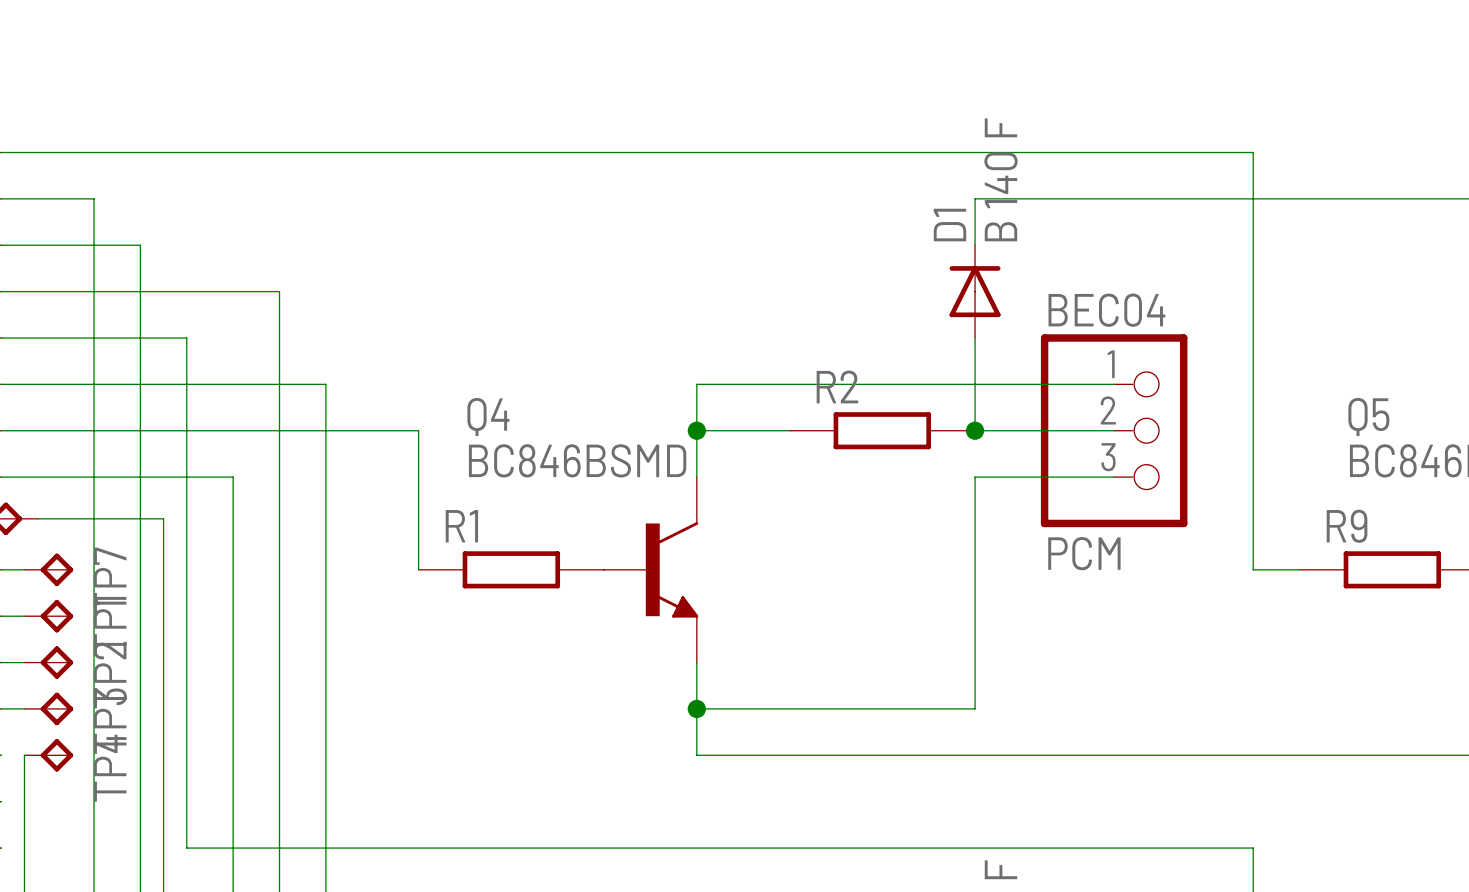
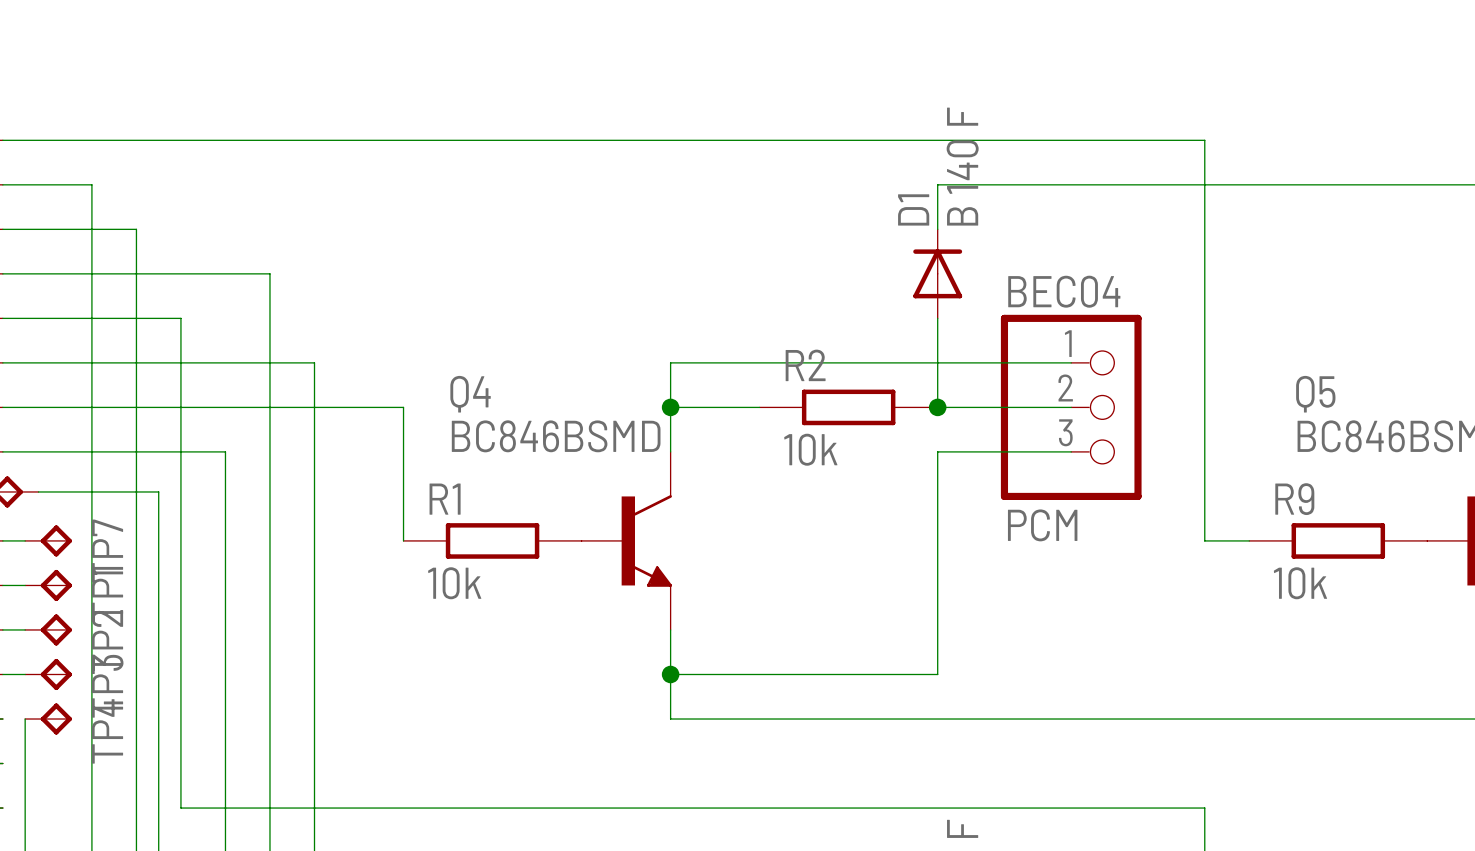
R2 value: none -> 10k (810, 449)
R1 value: none -> 10k (454, 583)
R9 value: none -> 10k (1300, 583)

